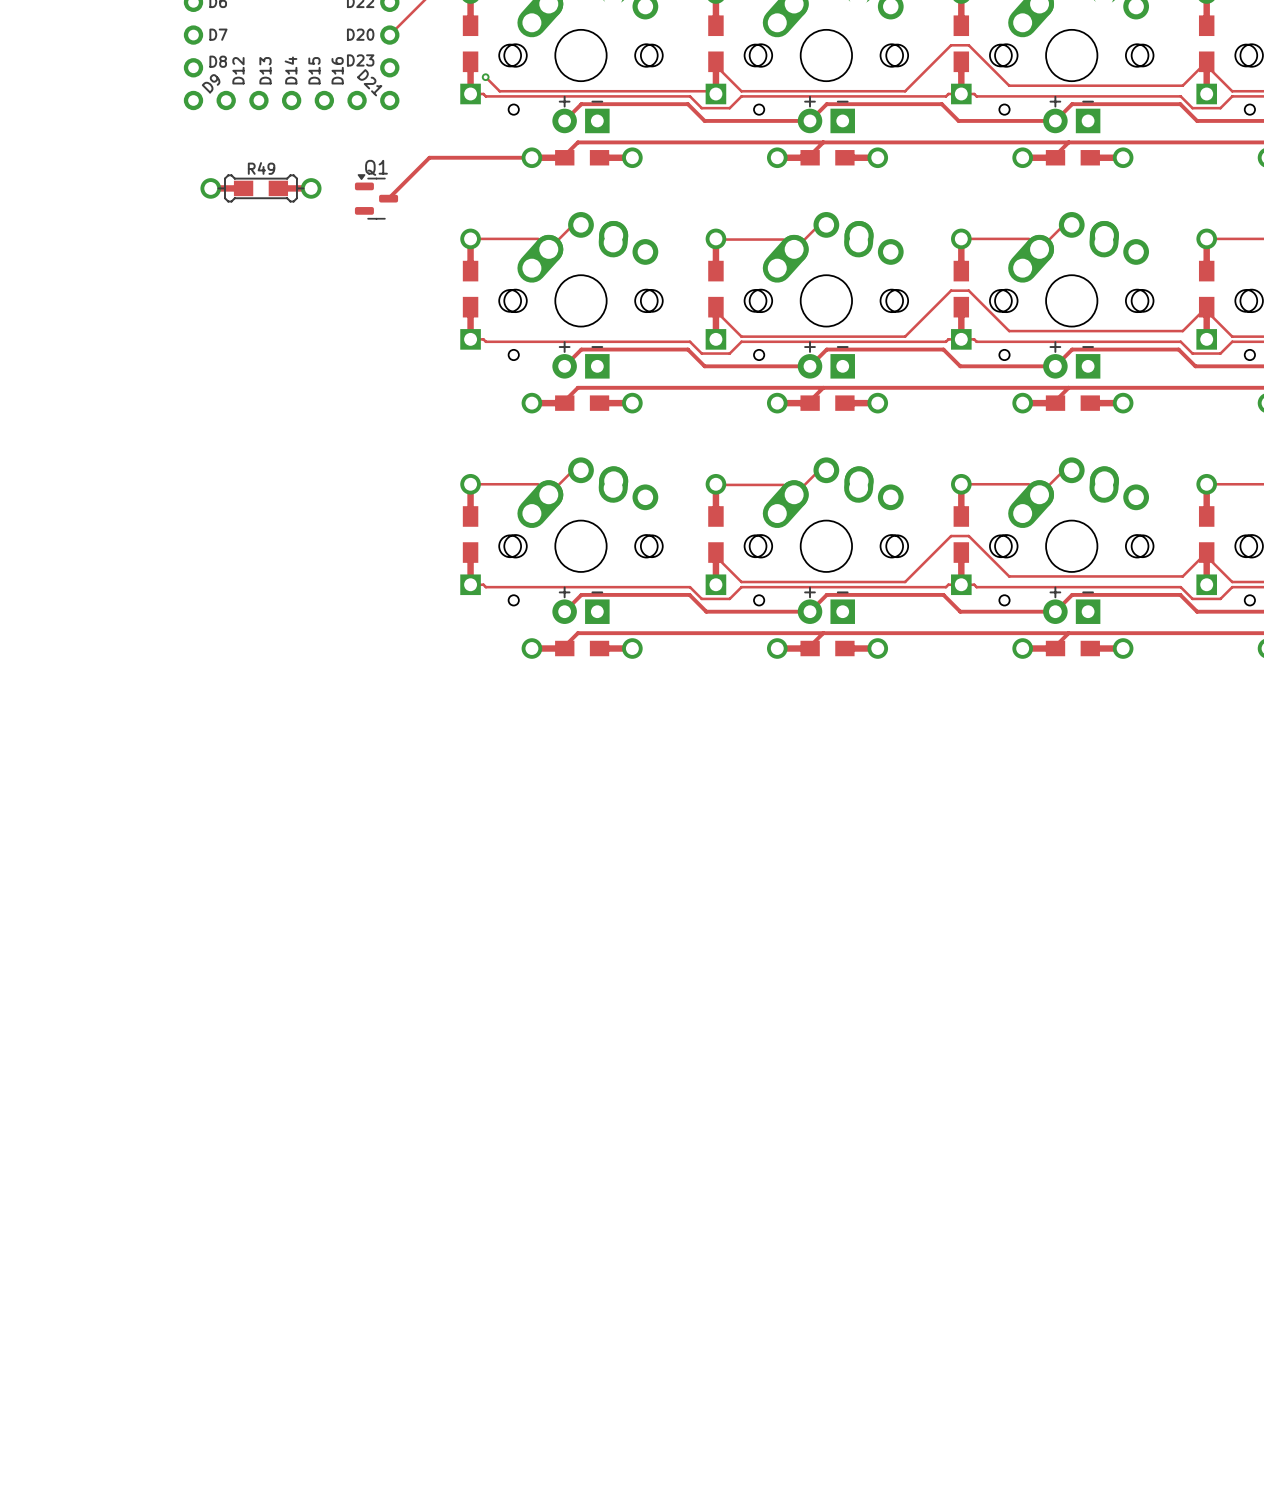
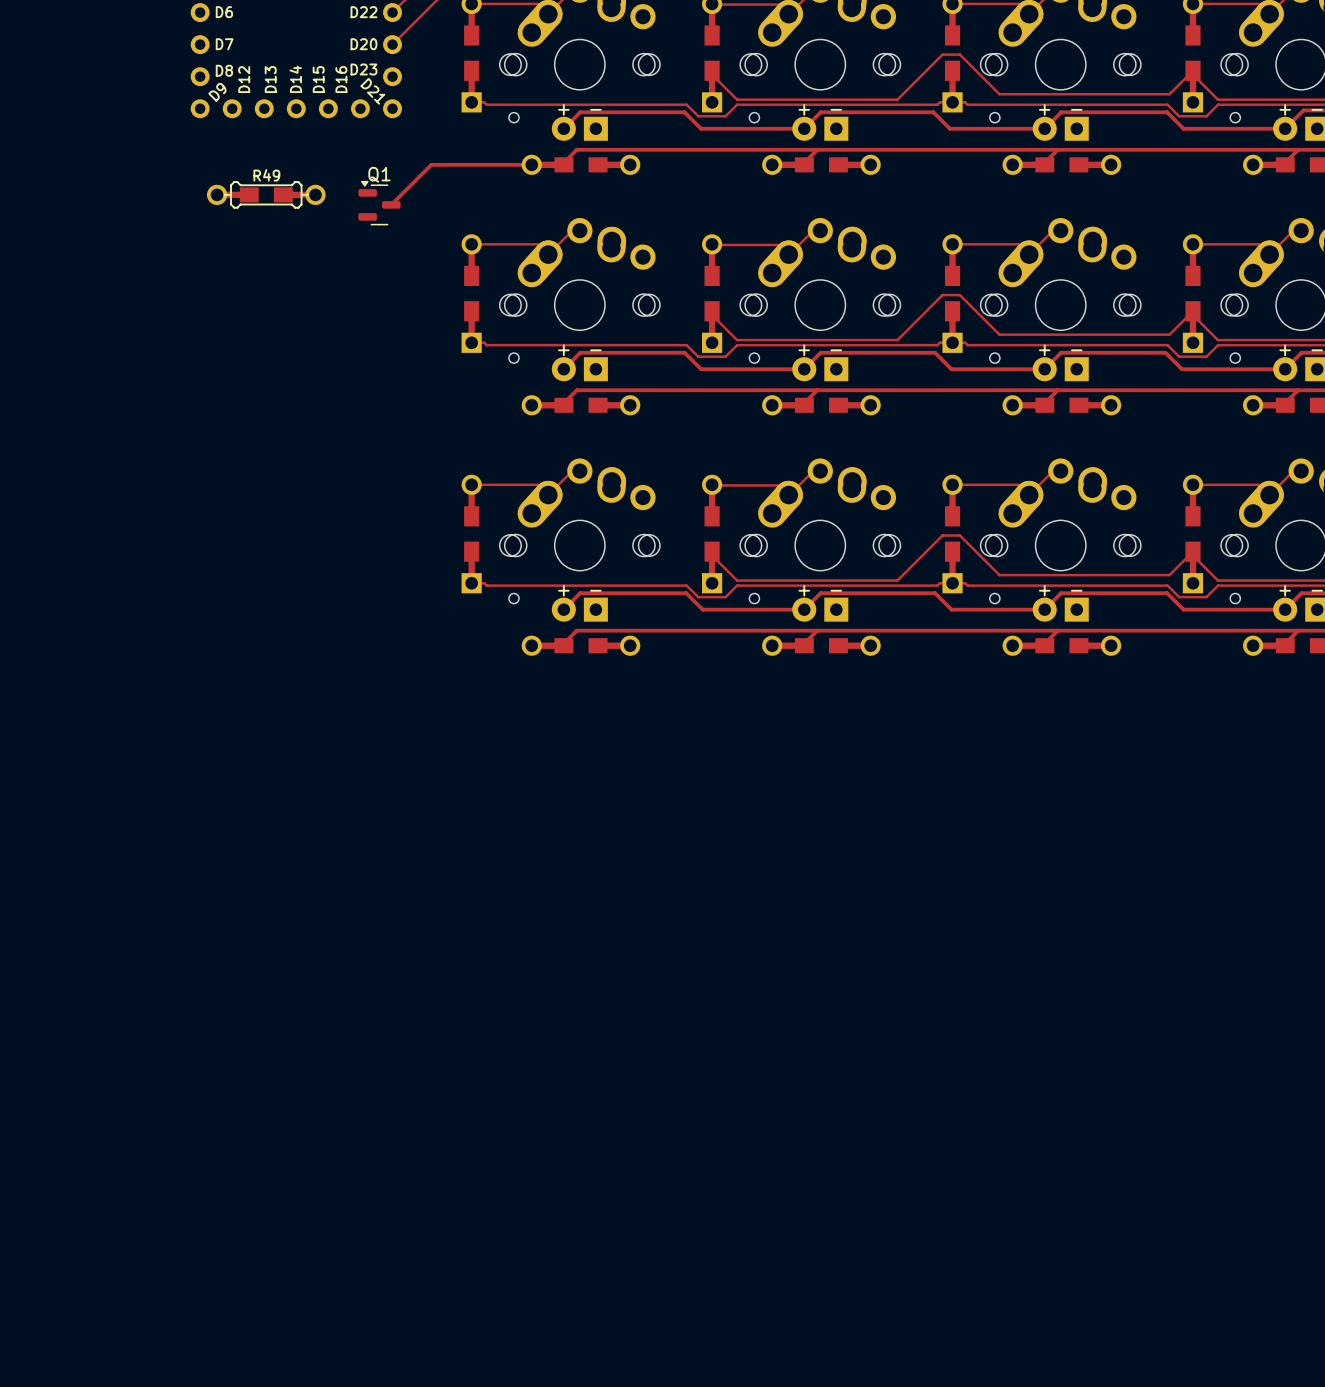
track: (485, 77) (499, 91) (713, 91) (715, 93) -> none
via: (485, 77) -> none

